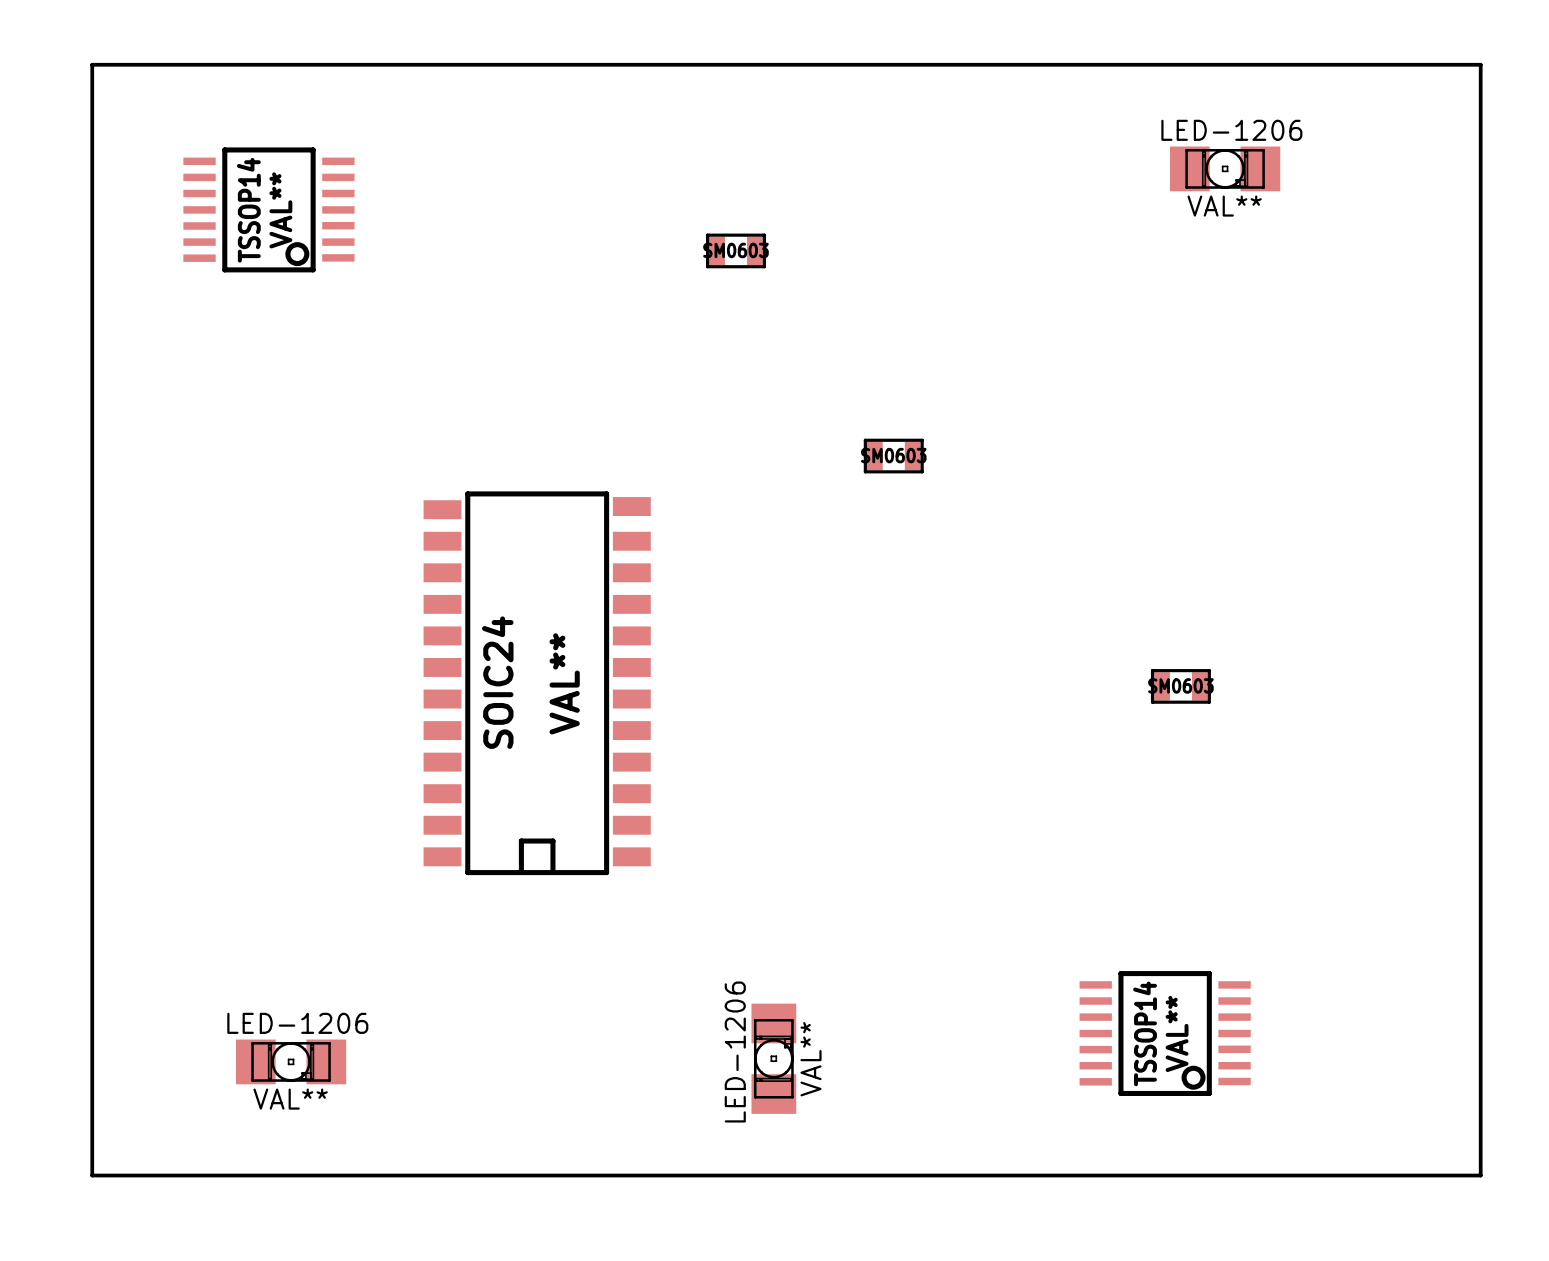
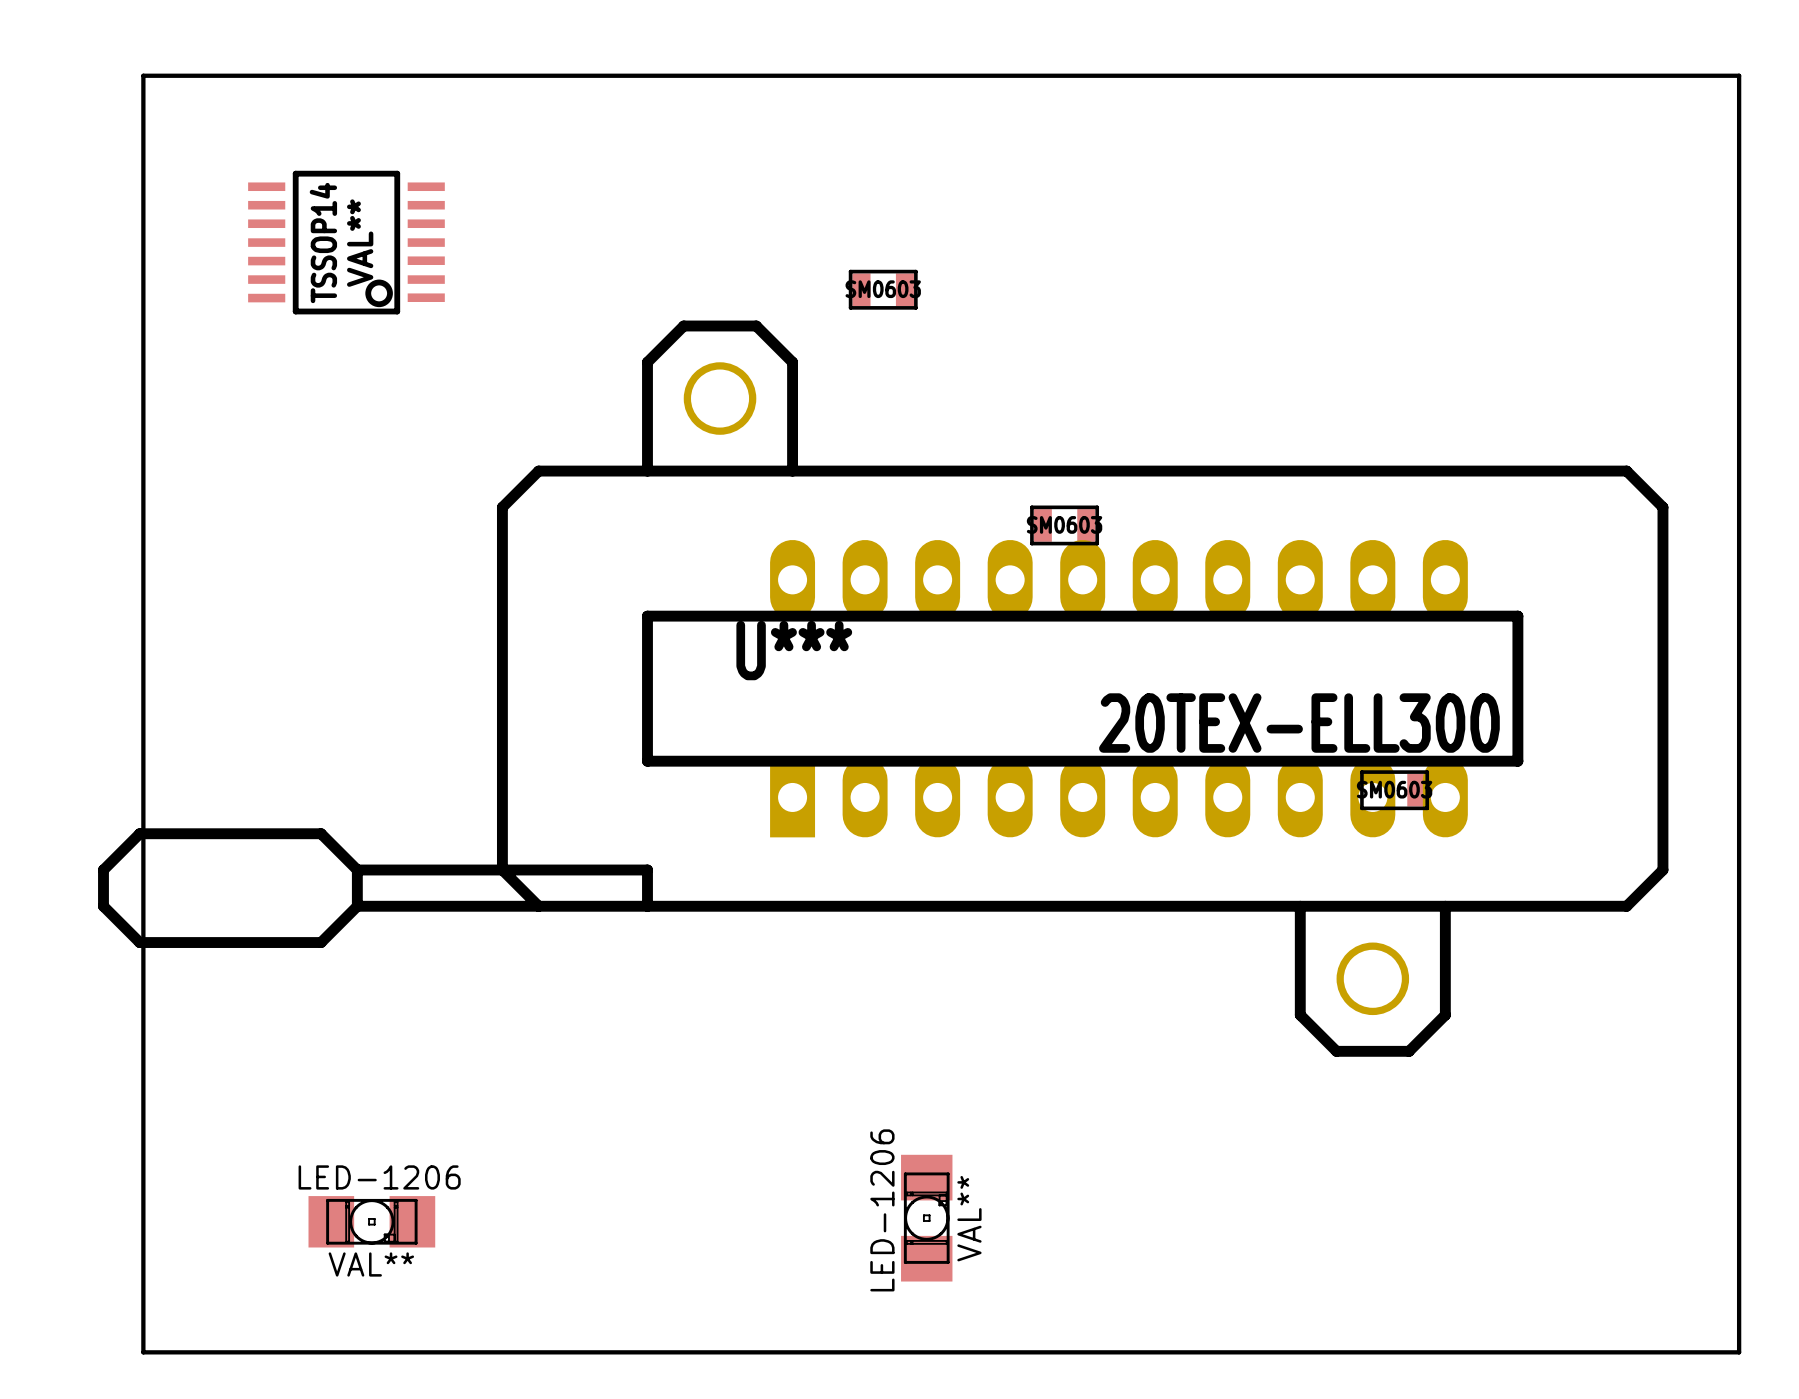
LED-1206: VAL** (1225, 168) -> none
U***: none -> 20TEX-ELL300 (883, 688)
SOIC24: VAL** (537, 683) -> none
TSSOP14: VAL** (1165, 1033) -> none

